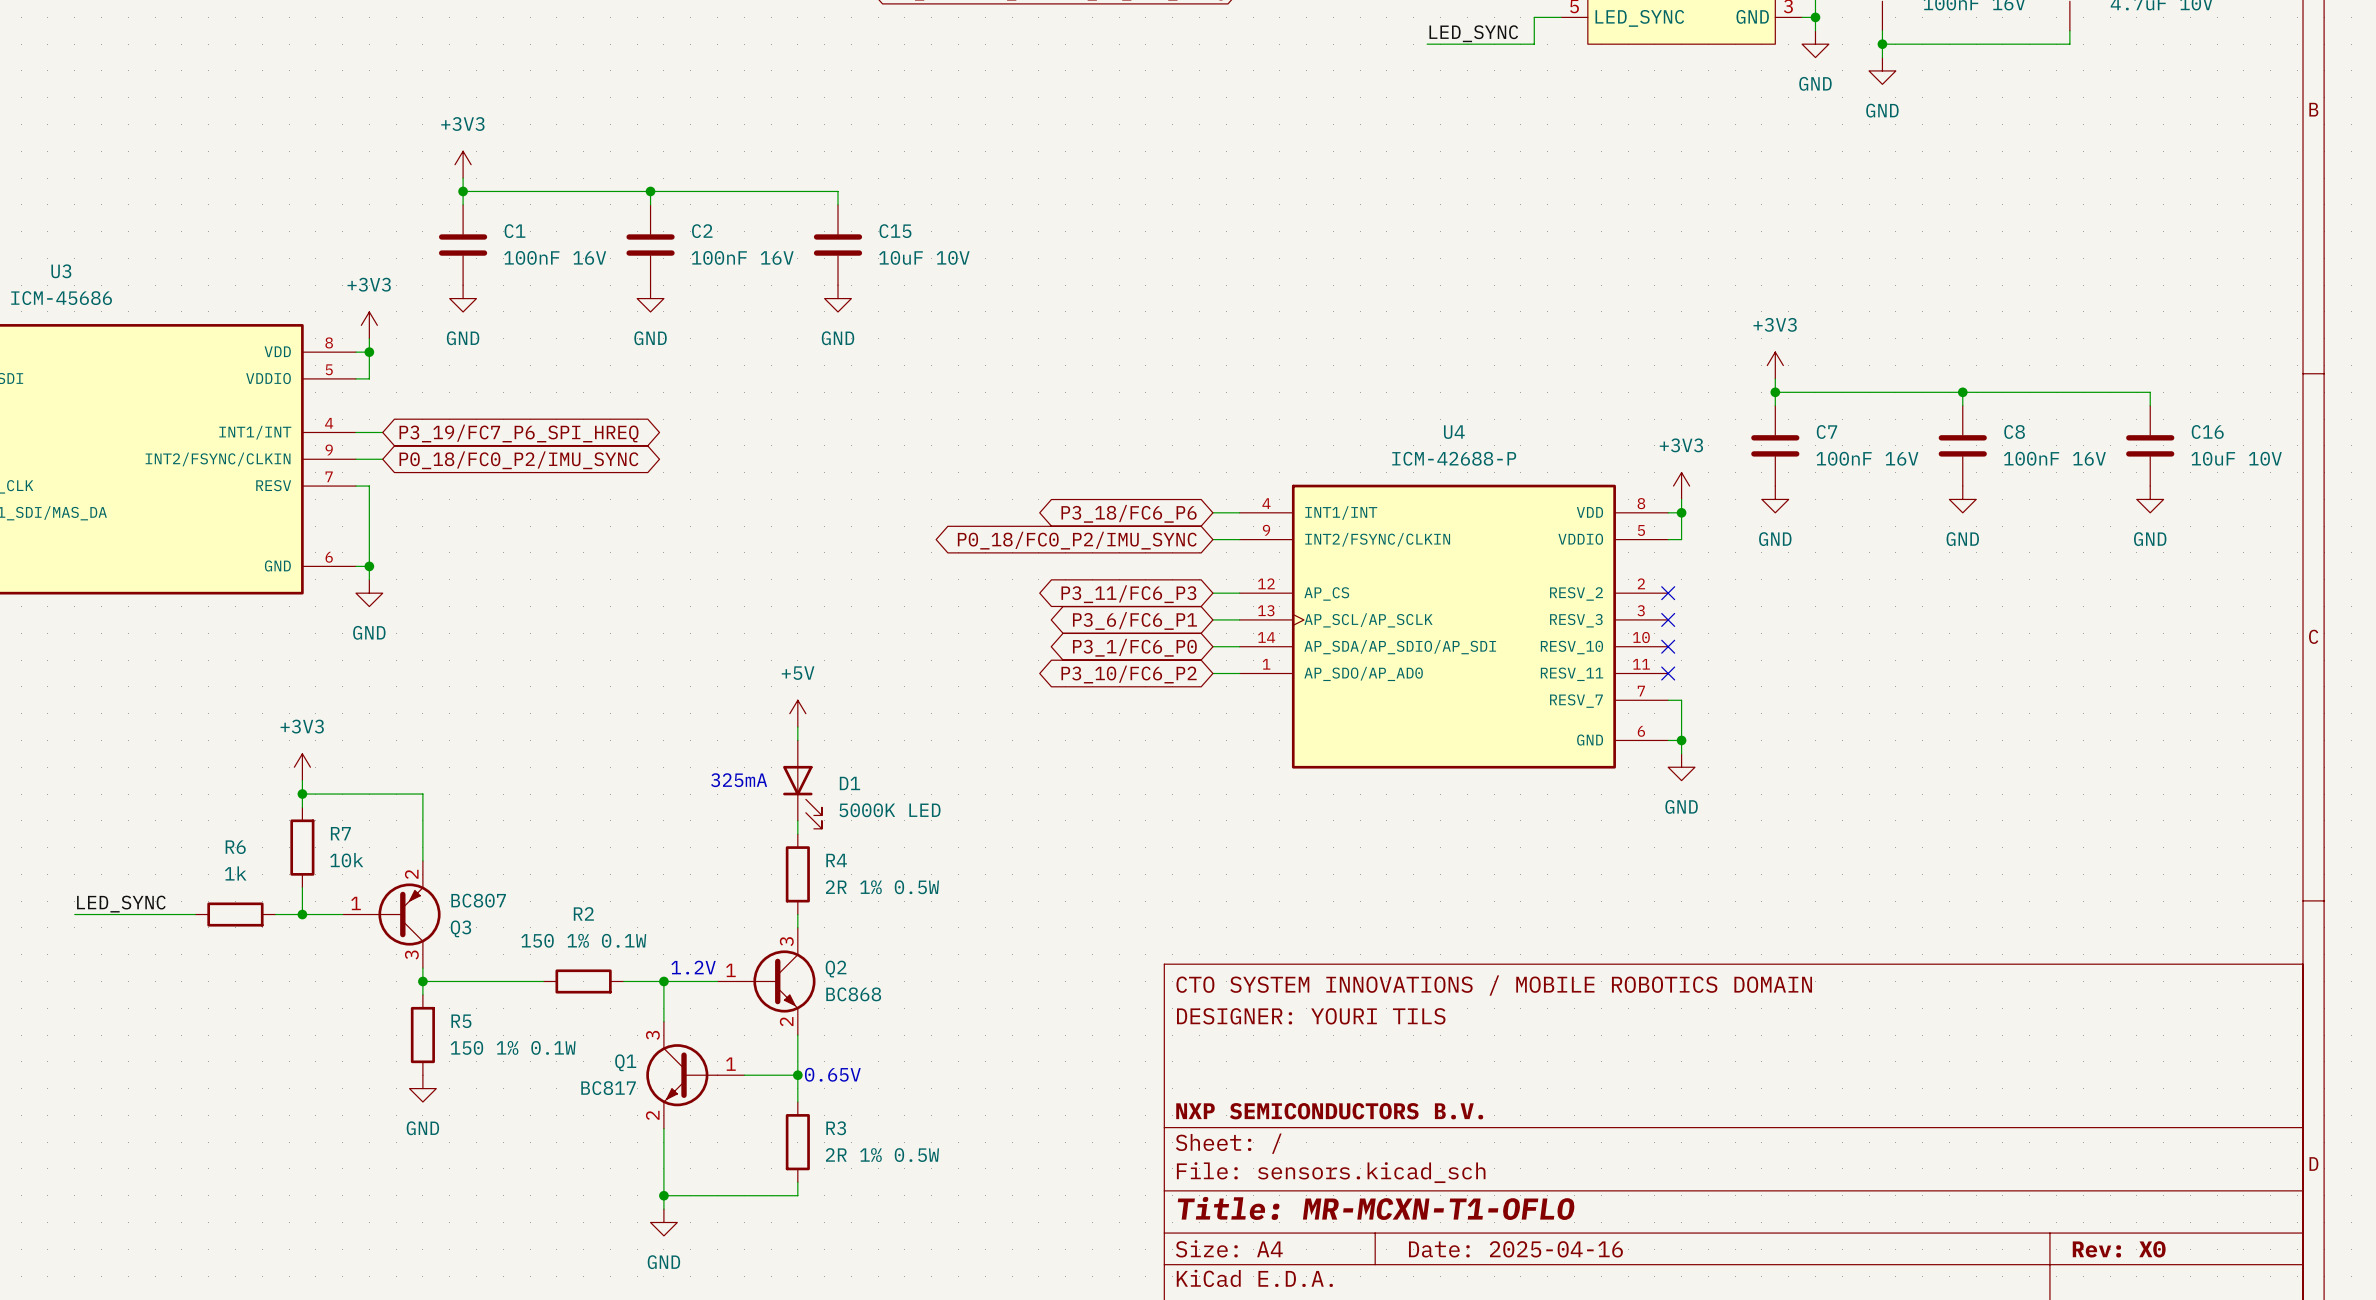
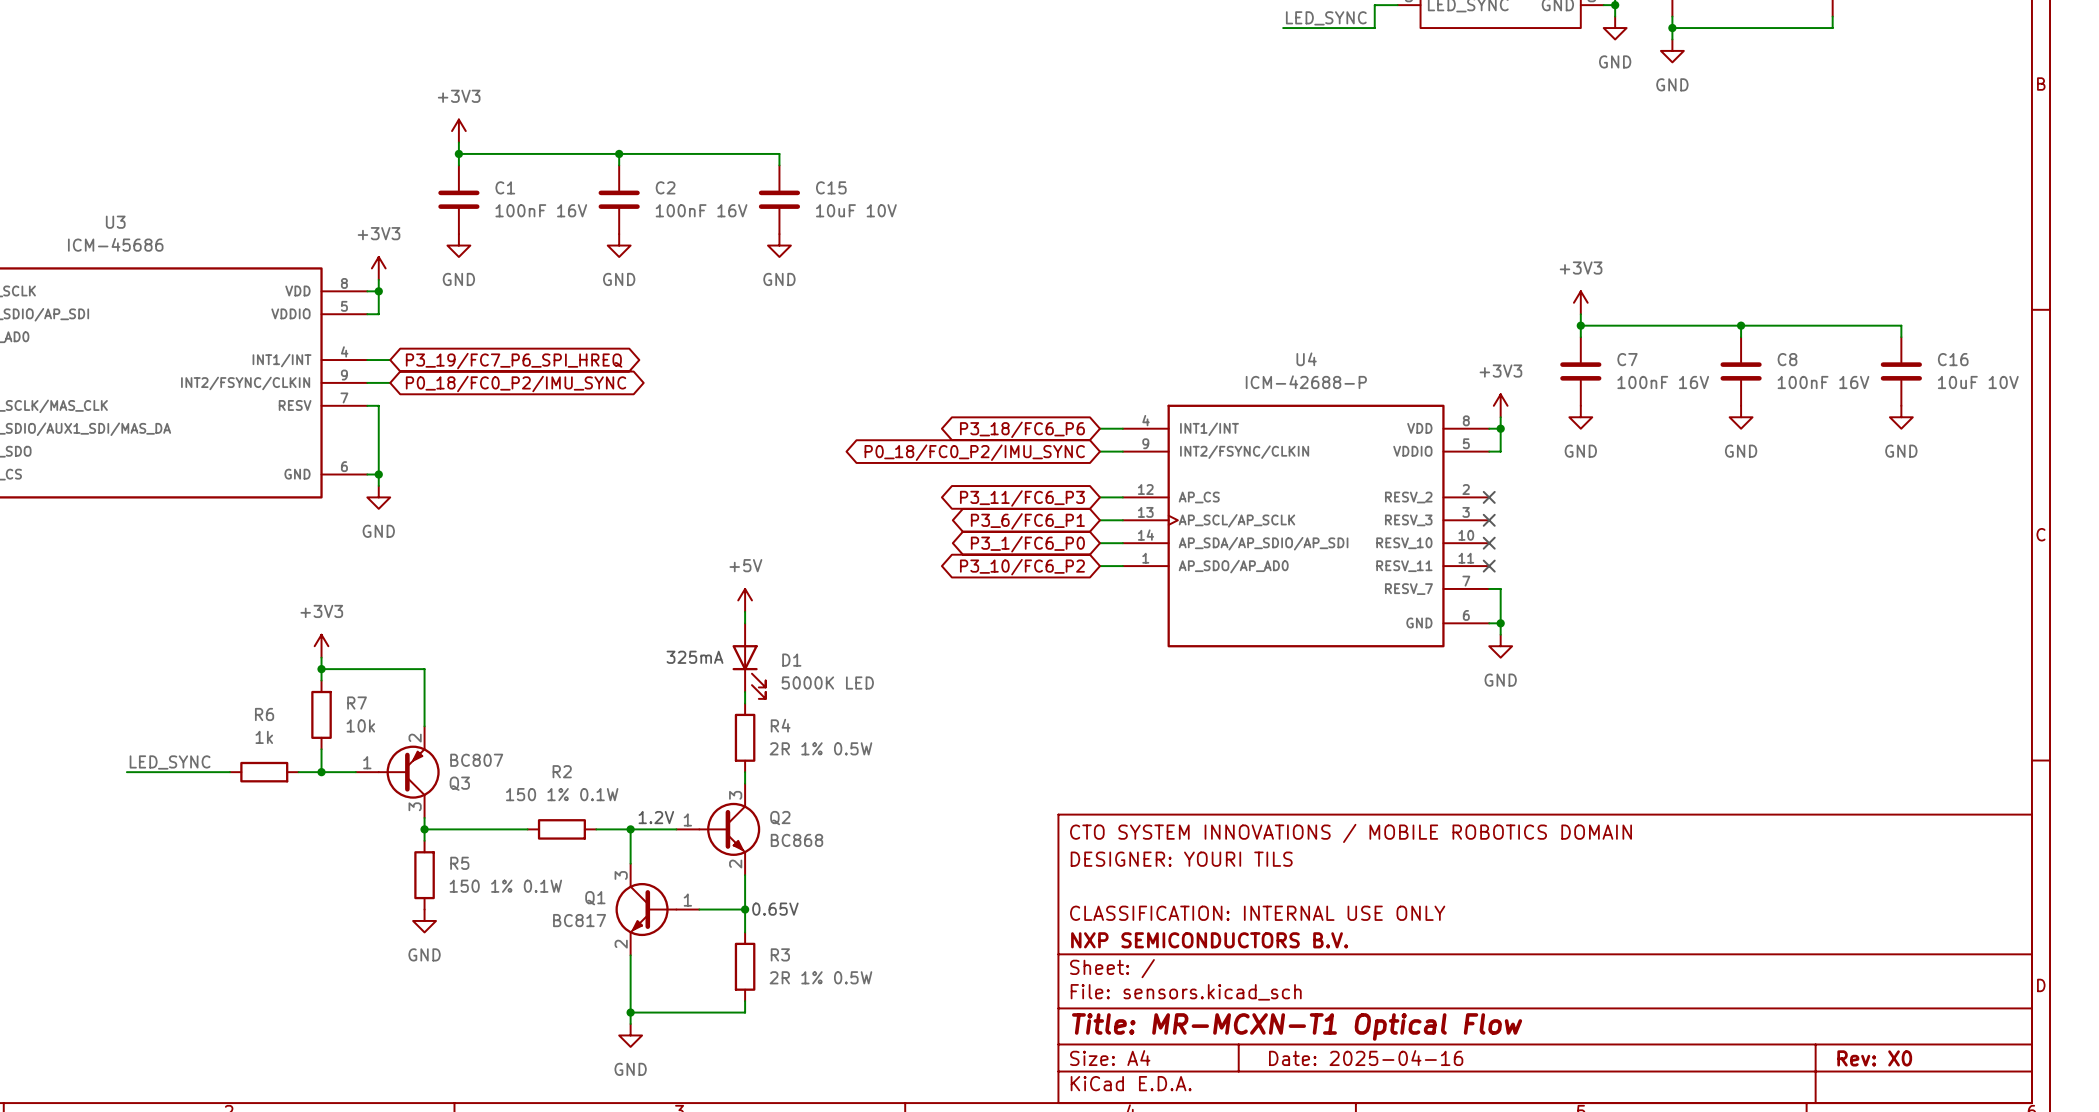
title block: none -> CLASSIFICATION: INTERNAL USE ONLY (1257, 913)
title block: Title: MR-MCXN-T1-OFLO (1376, 1208) -> Title: MR-MCXN-T1 Optical Flow (1297, 1026)

